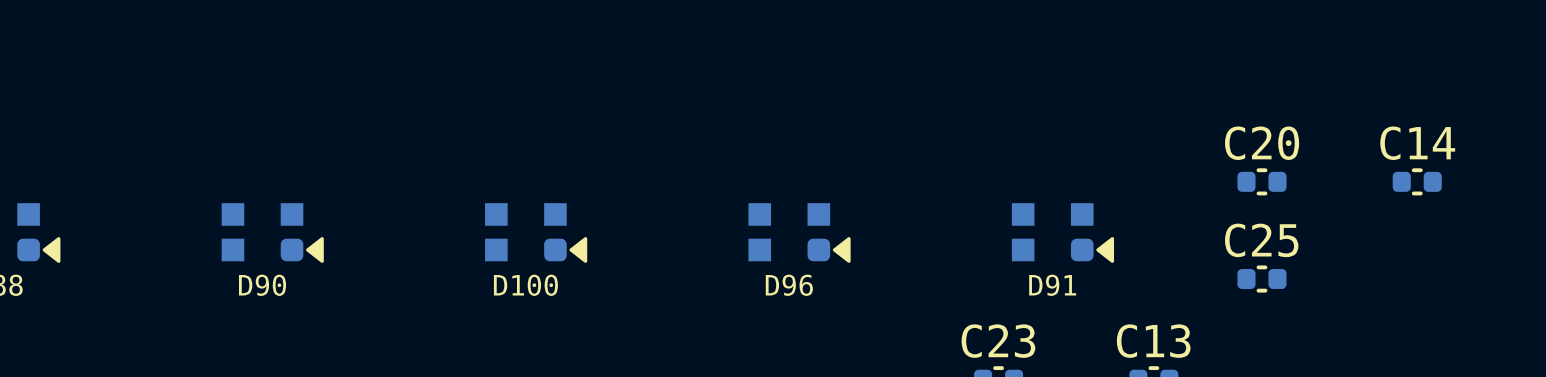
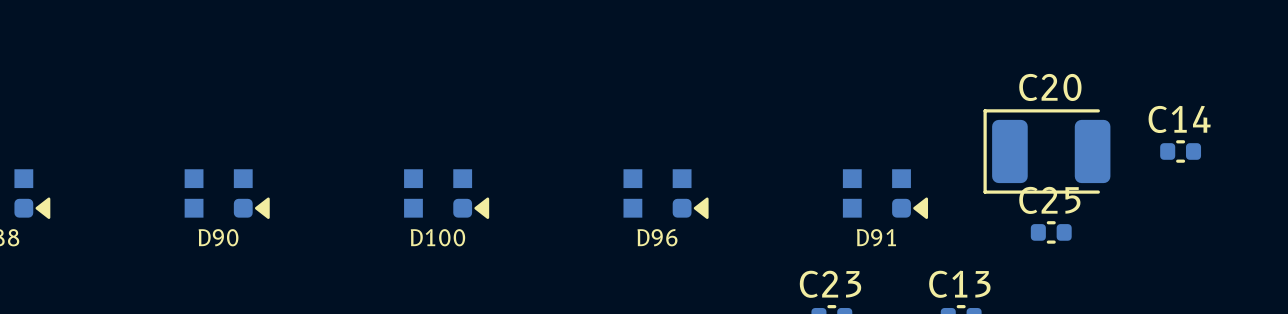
C20 footprint: [1237, 168, 1287, 196] -> [983, 109, 1111, 194]

